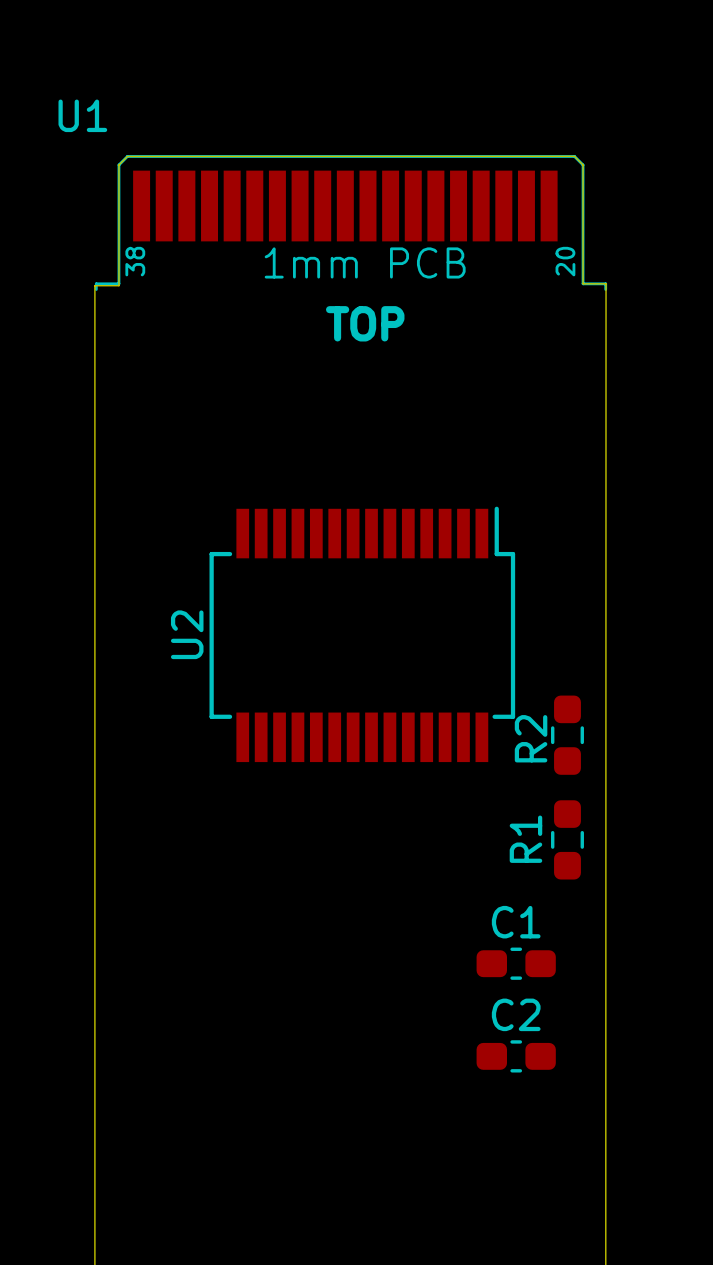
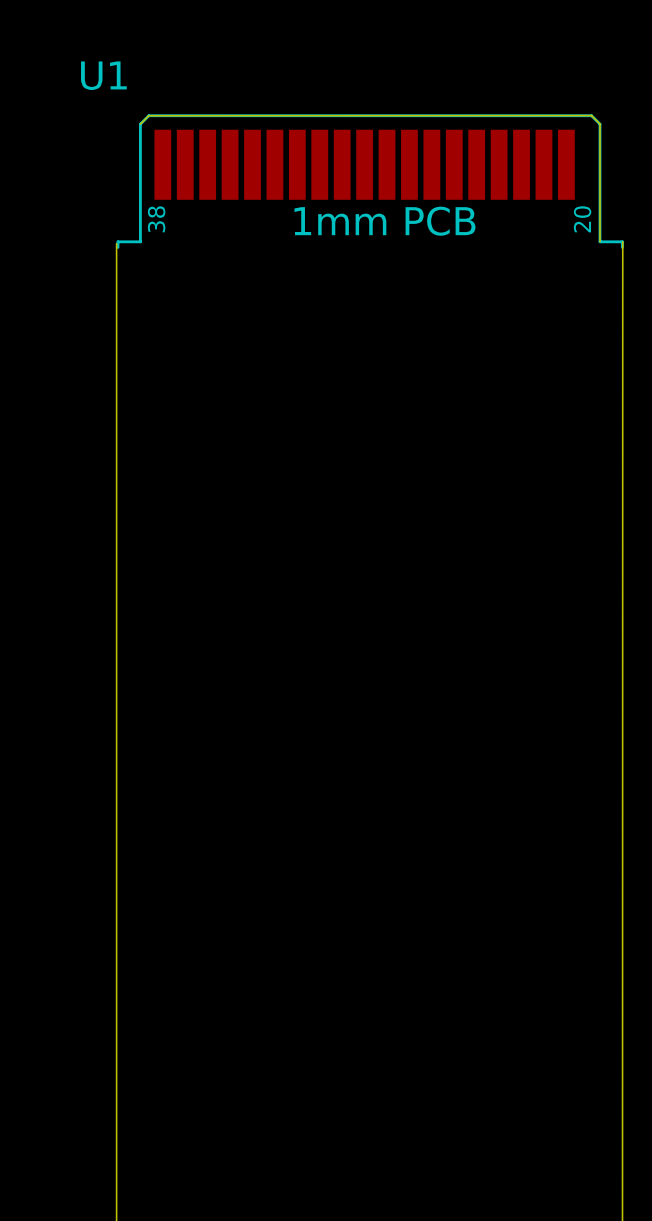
board edge: (118, 164) (118, 285) (94, 285) -> none
board edge: (583, 283) (606, 283) -> none
text: TOP (365, 323) -> none
U2: (362, 634) -> none
R2: (567, 735) -> none
R1: (567, 839) -> none
C1: (516, 963) -> none
C2: (516, 1056) -> none

